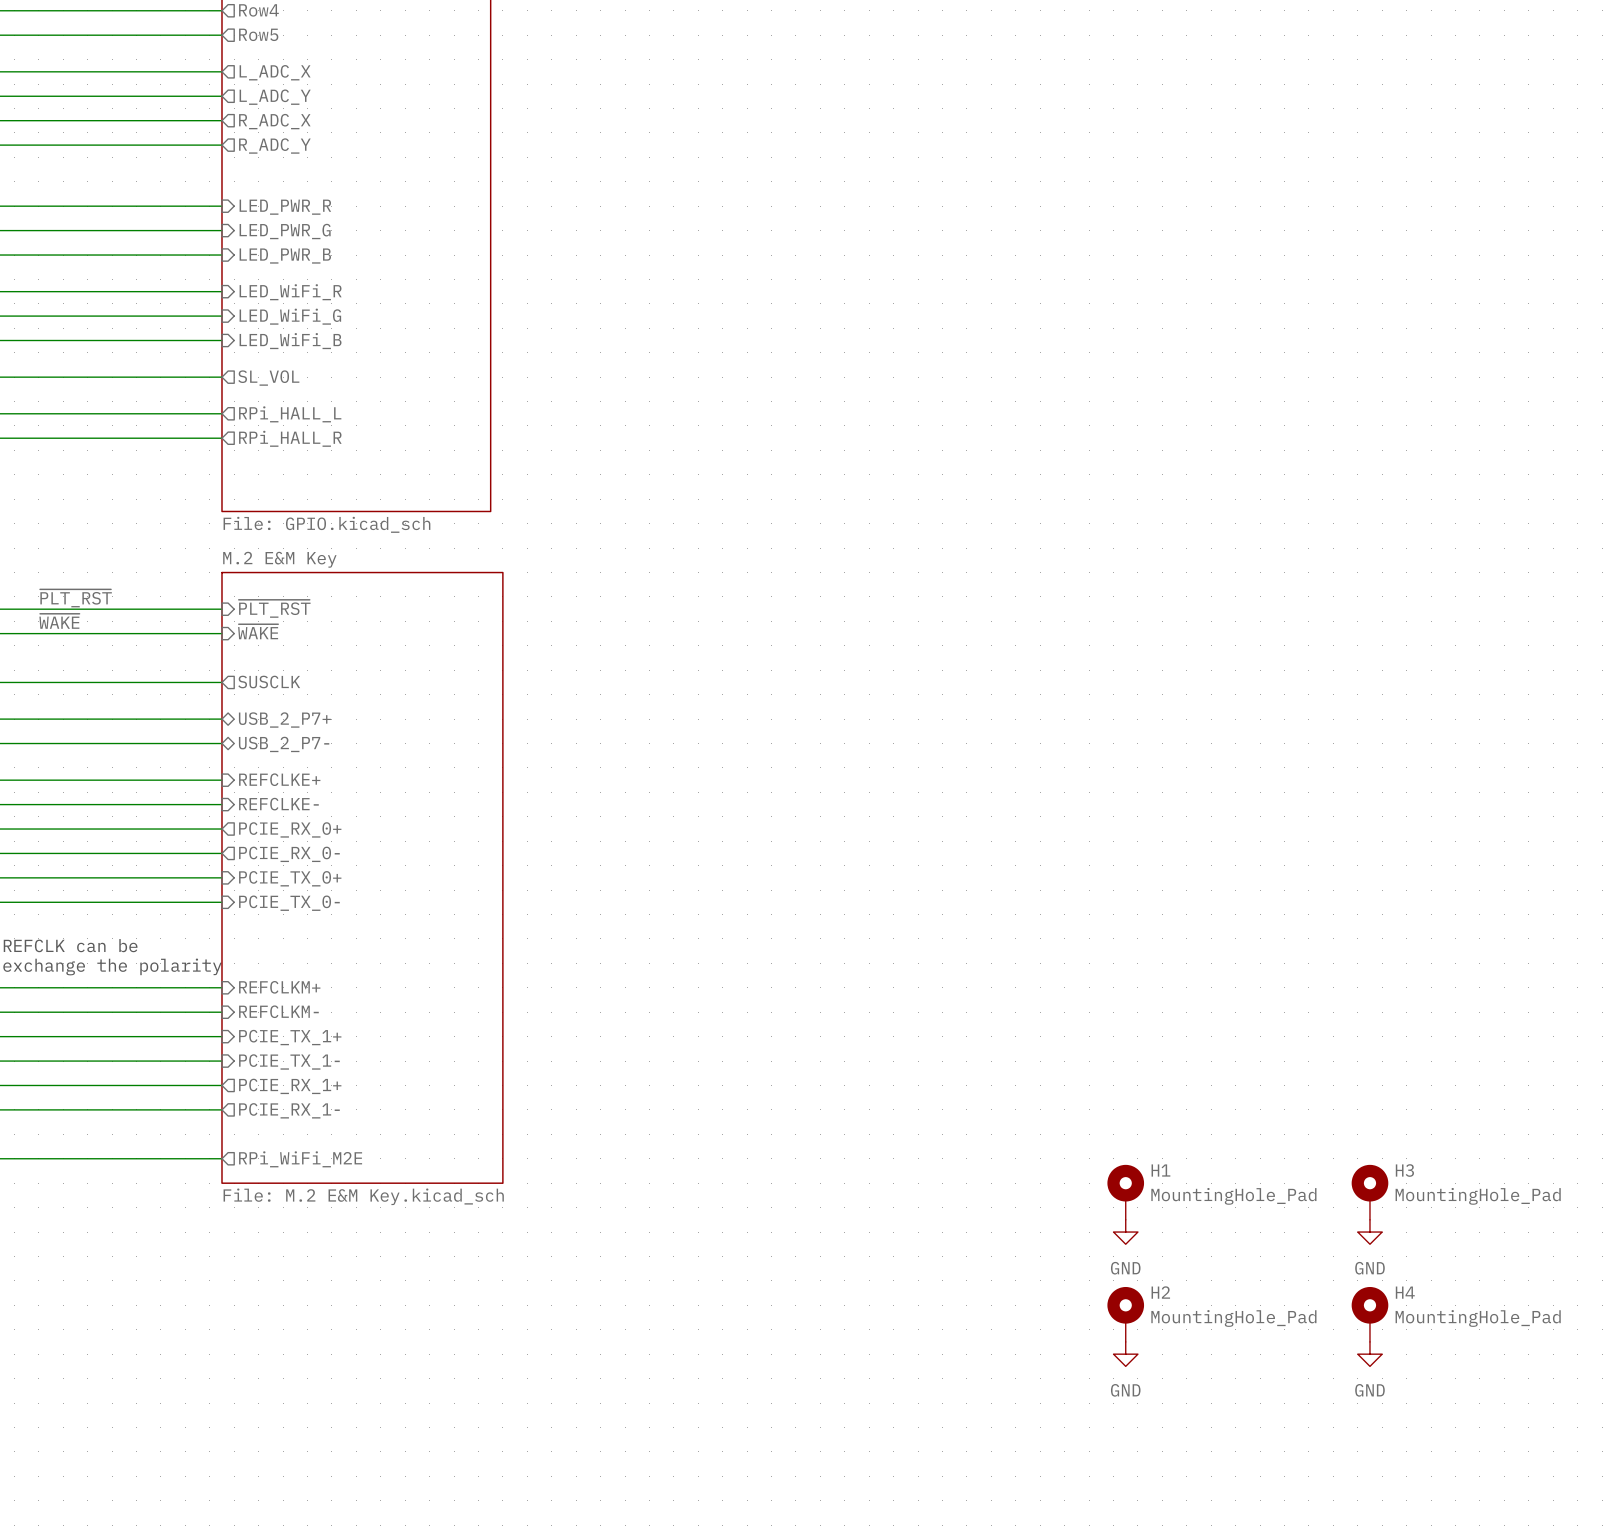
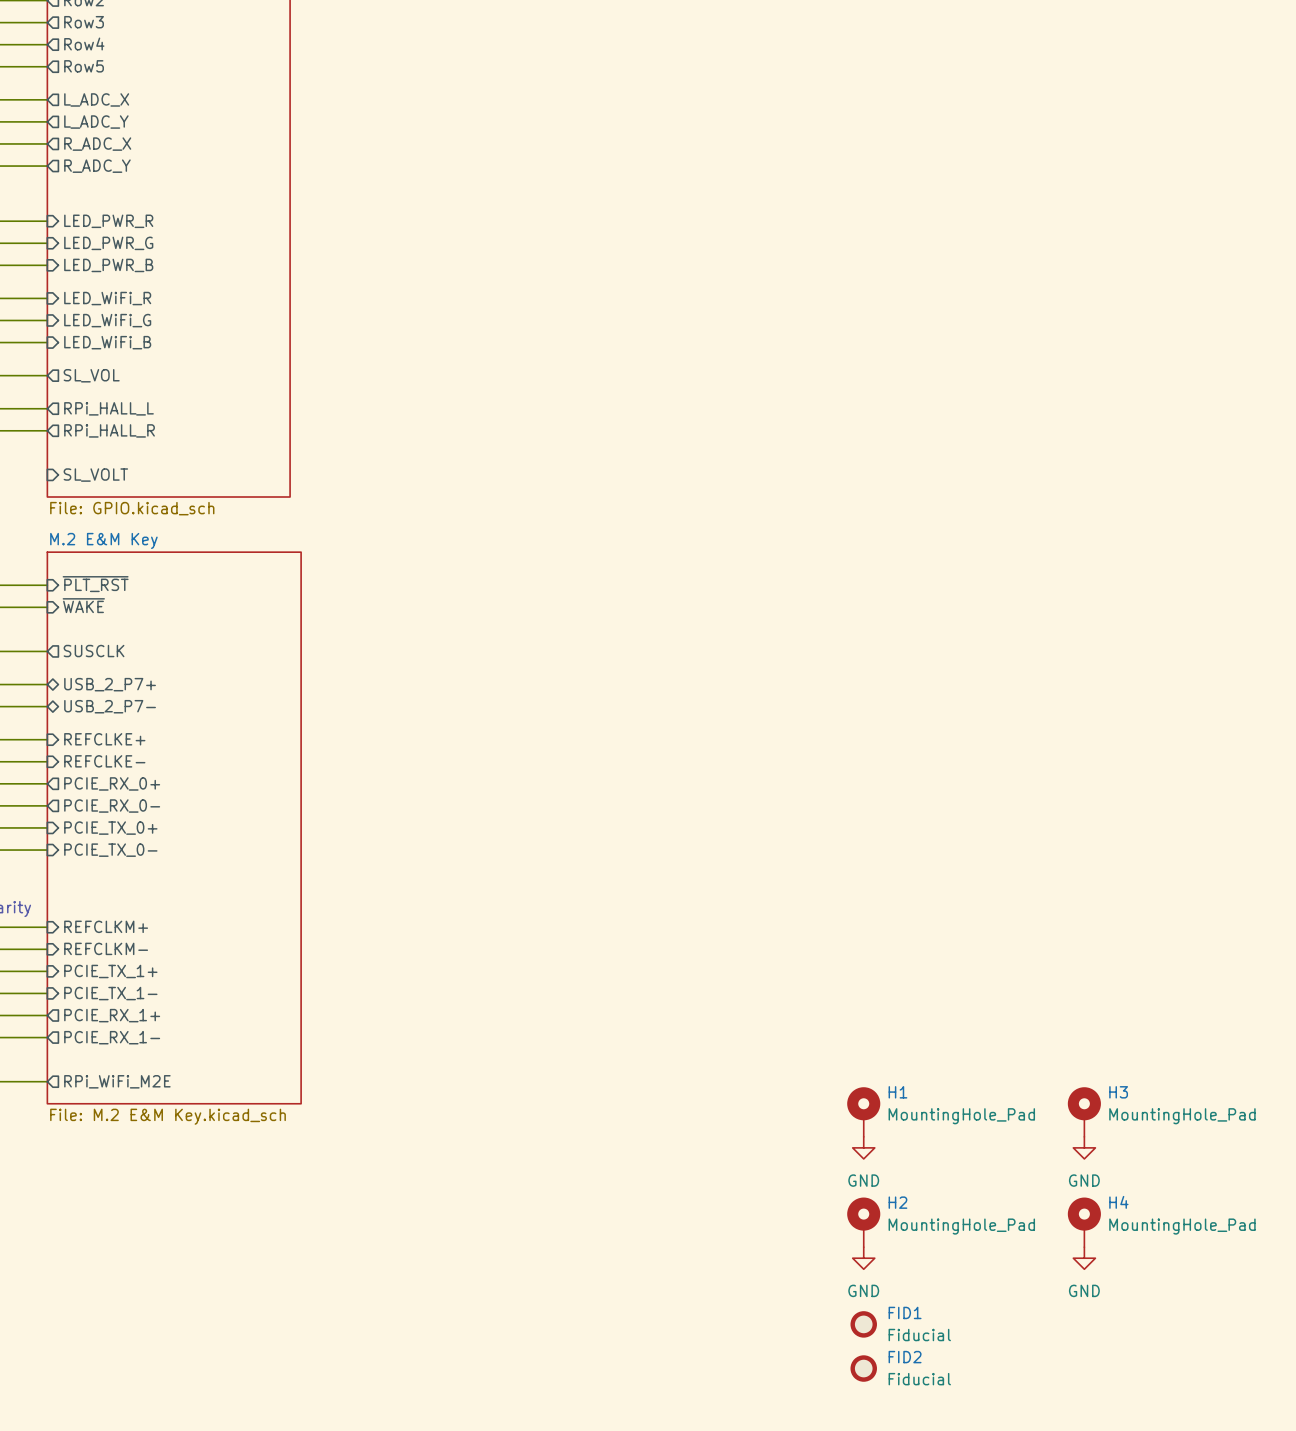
sheet pin: none -> SL_VOLT (95, 475)
FID1: none -> Fiducial (863, 1324)
FID2: none -> Fiducial (863, 1368)

